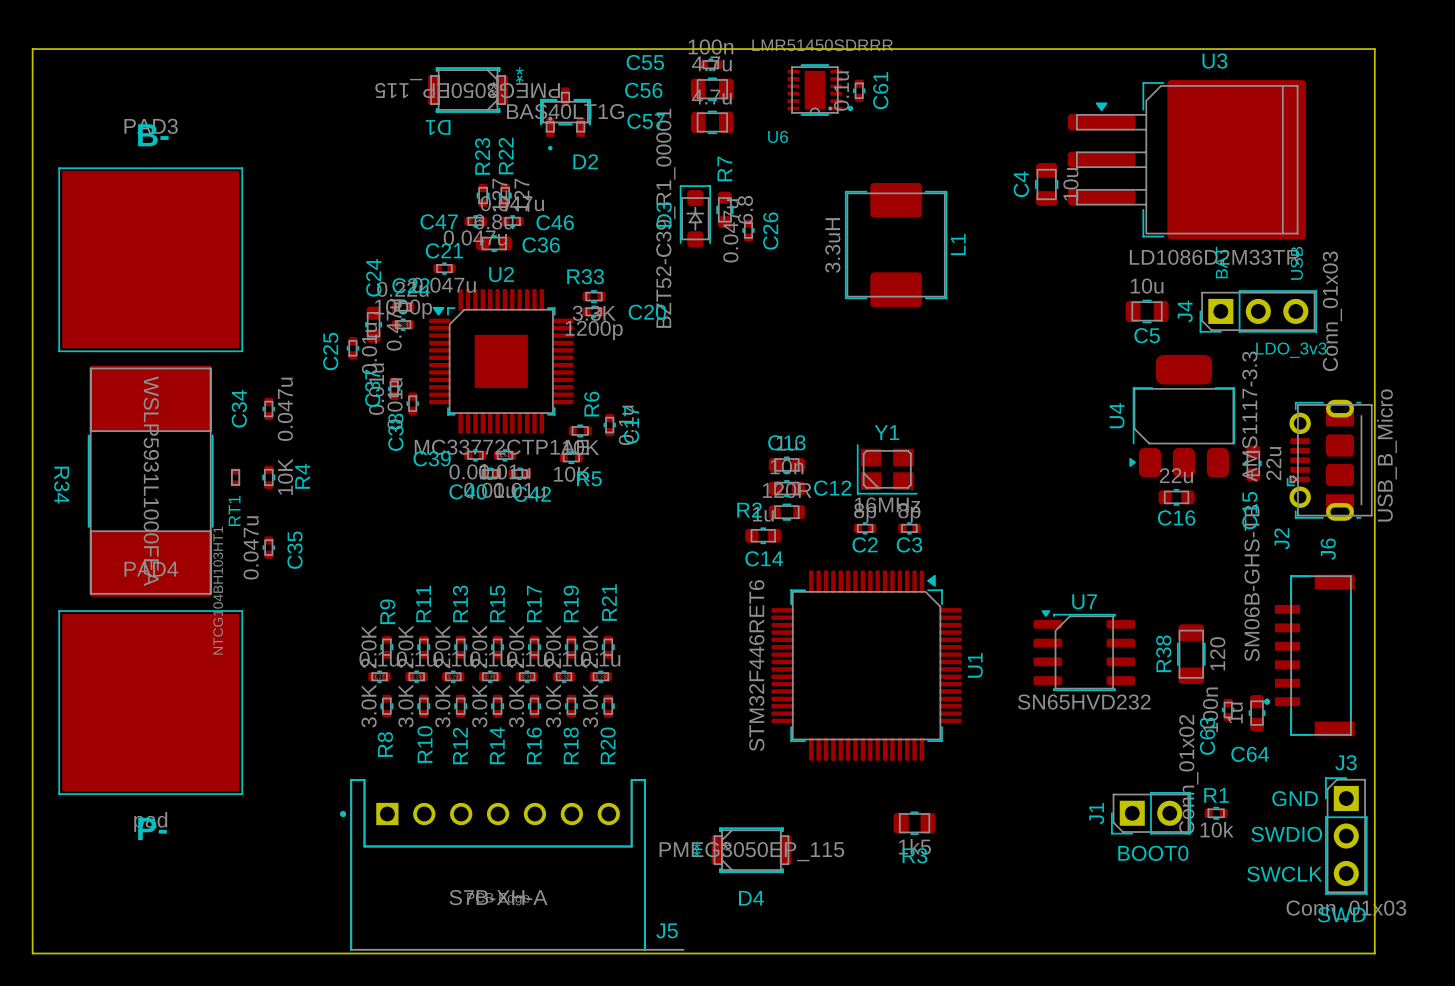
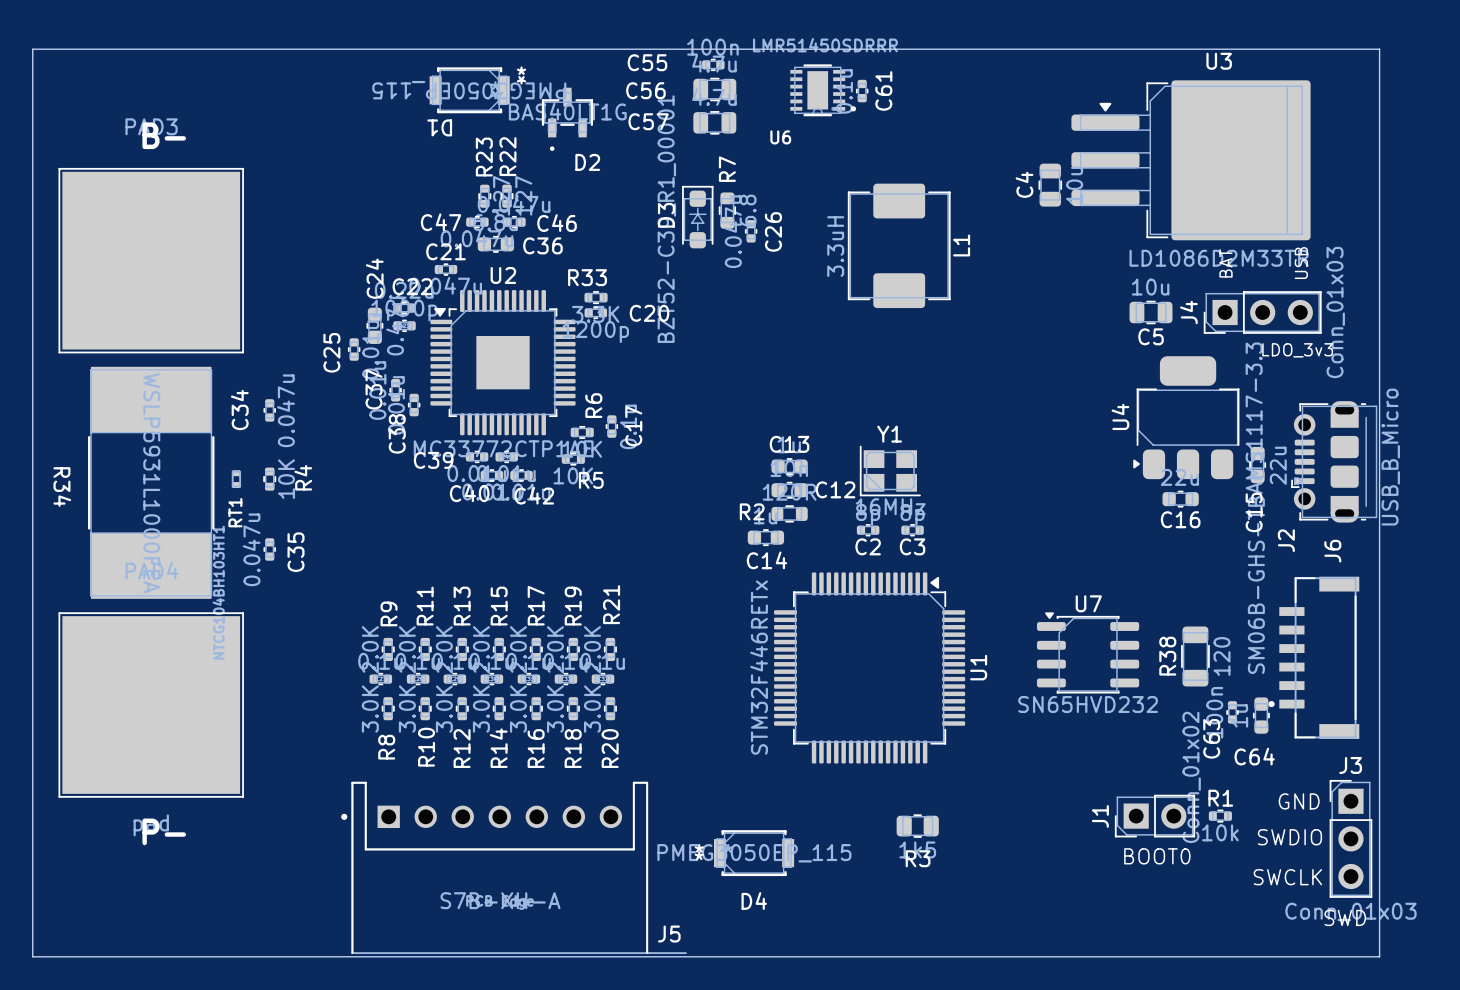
U1 value: STM32F446RET6 (756, 665) -> STM32F446RETx (759, 667)

